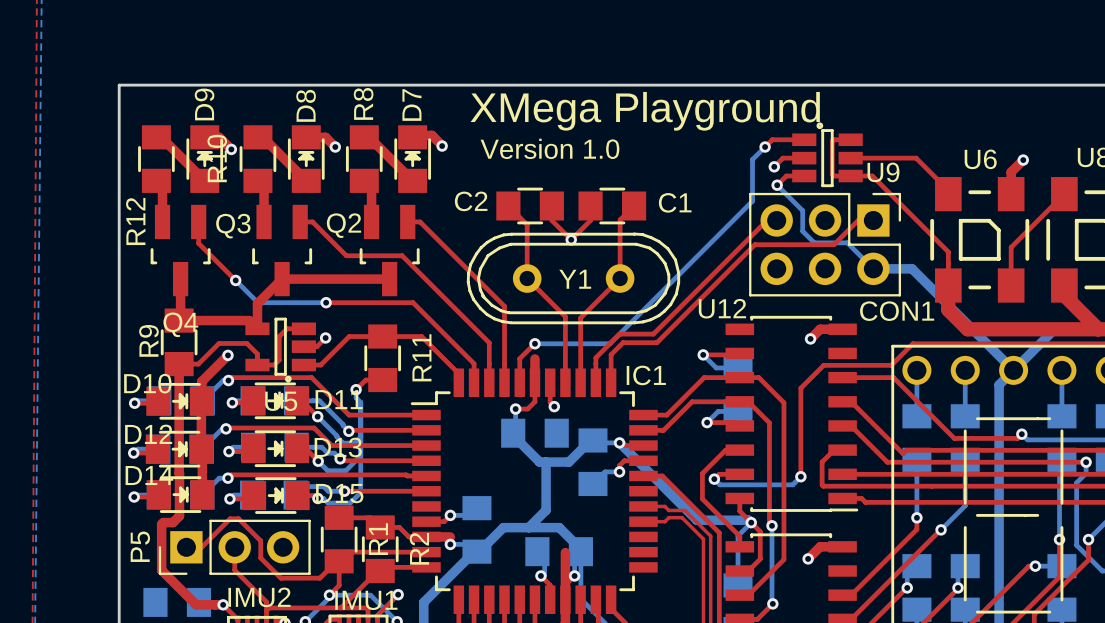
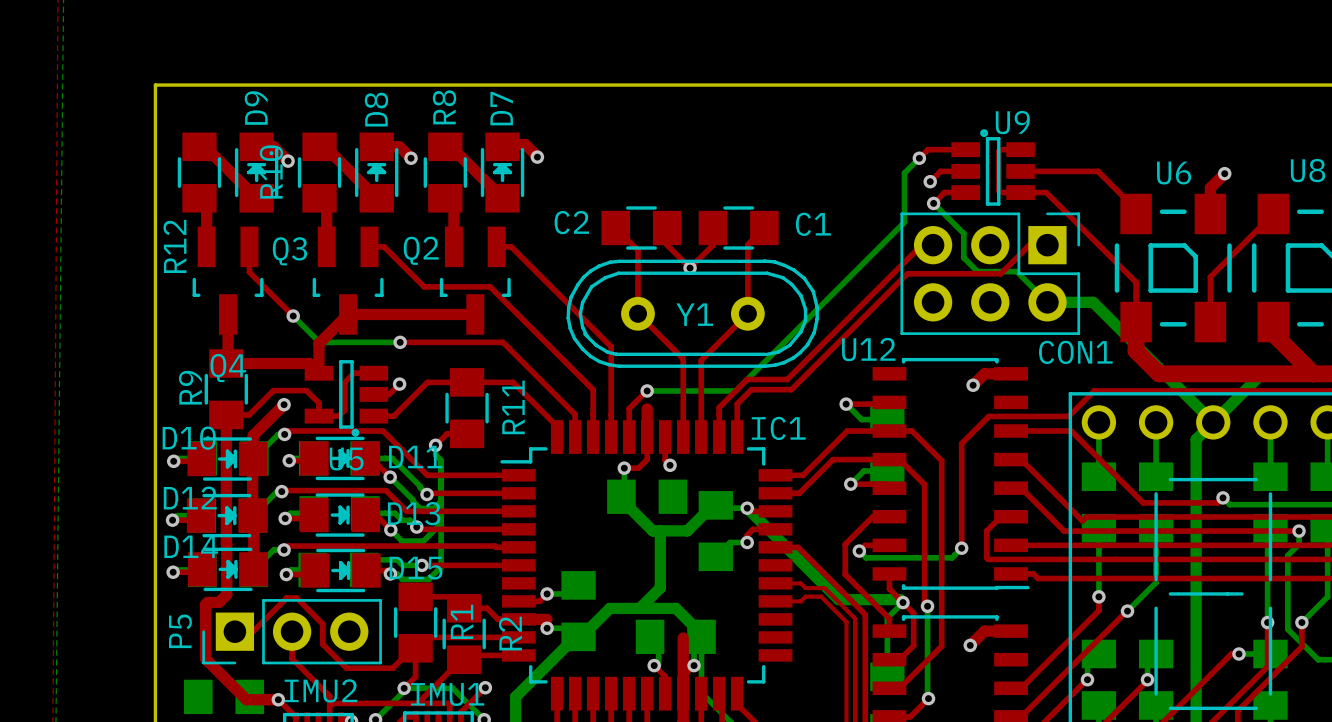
text: XMega Playground (645, 111) -> none
text: Version 1.0 (549, 148) -> none
U9 name position: U9 (883, 172) -> U9 (1012, 122)

